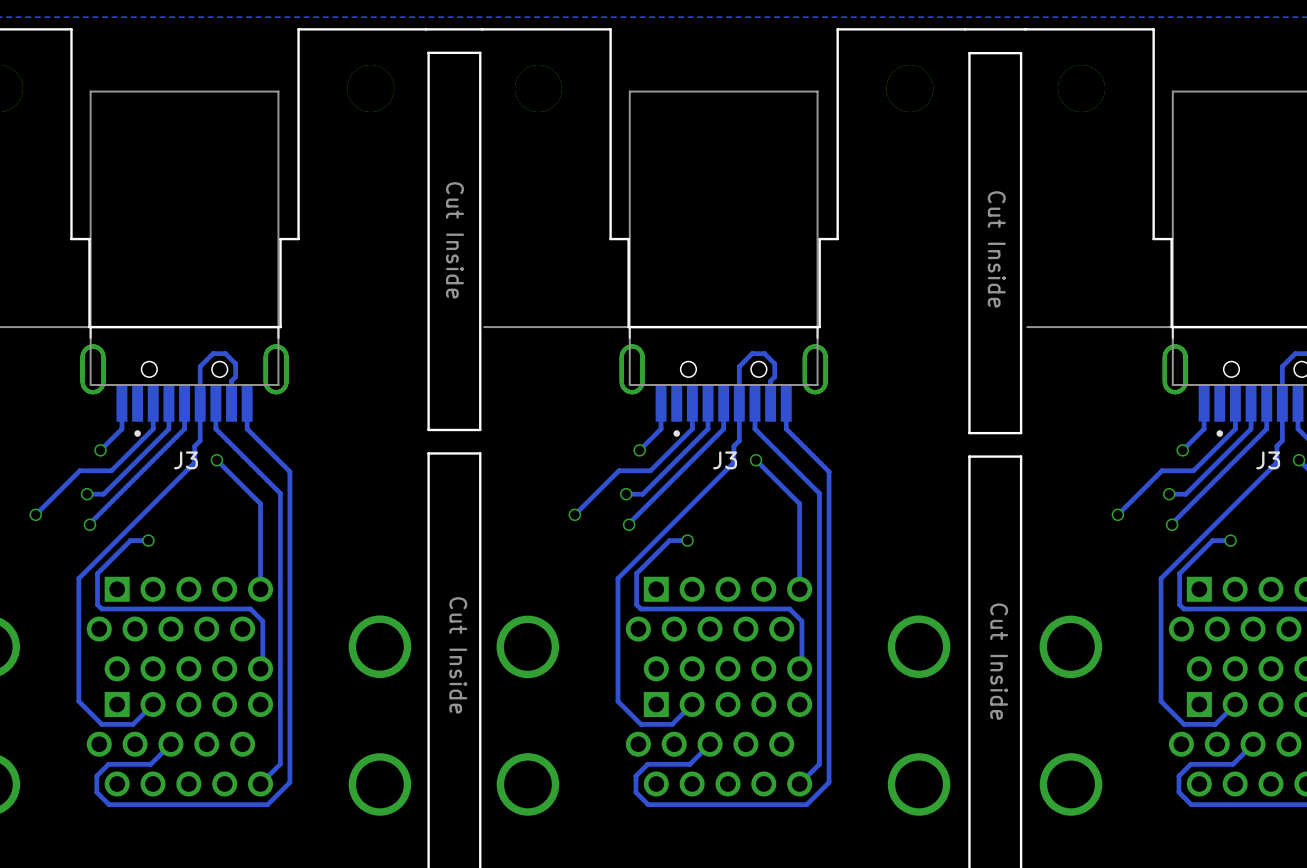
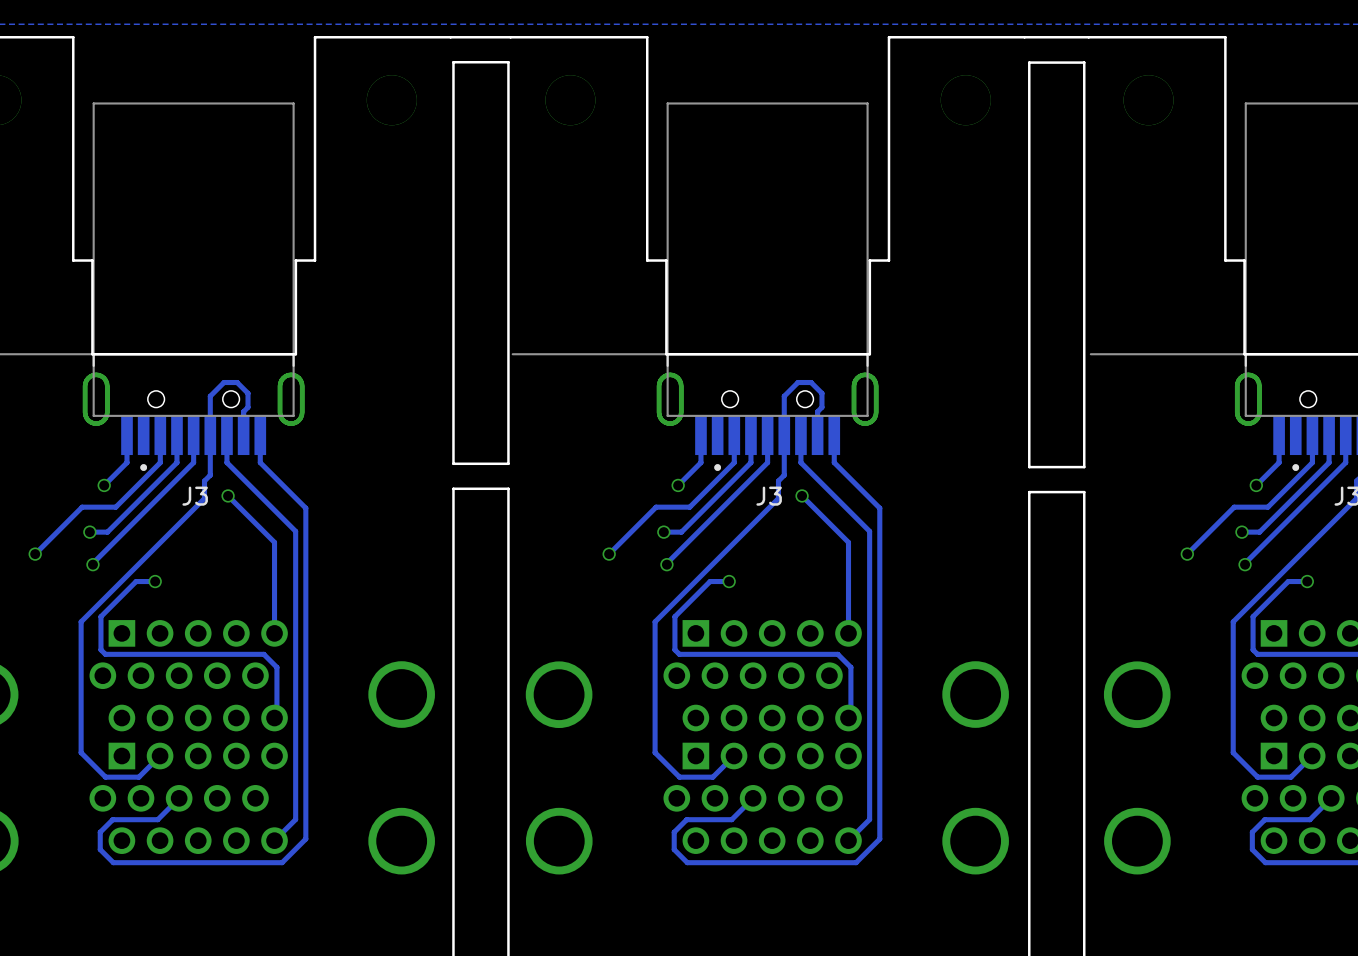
text: Cut Inside (455, 240) -> none
text: Cut Inside (996, 249) -> none
text: Cut Inside (458, 655) -> none
text: Cut Inside (999, 661) -> none

